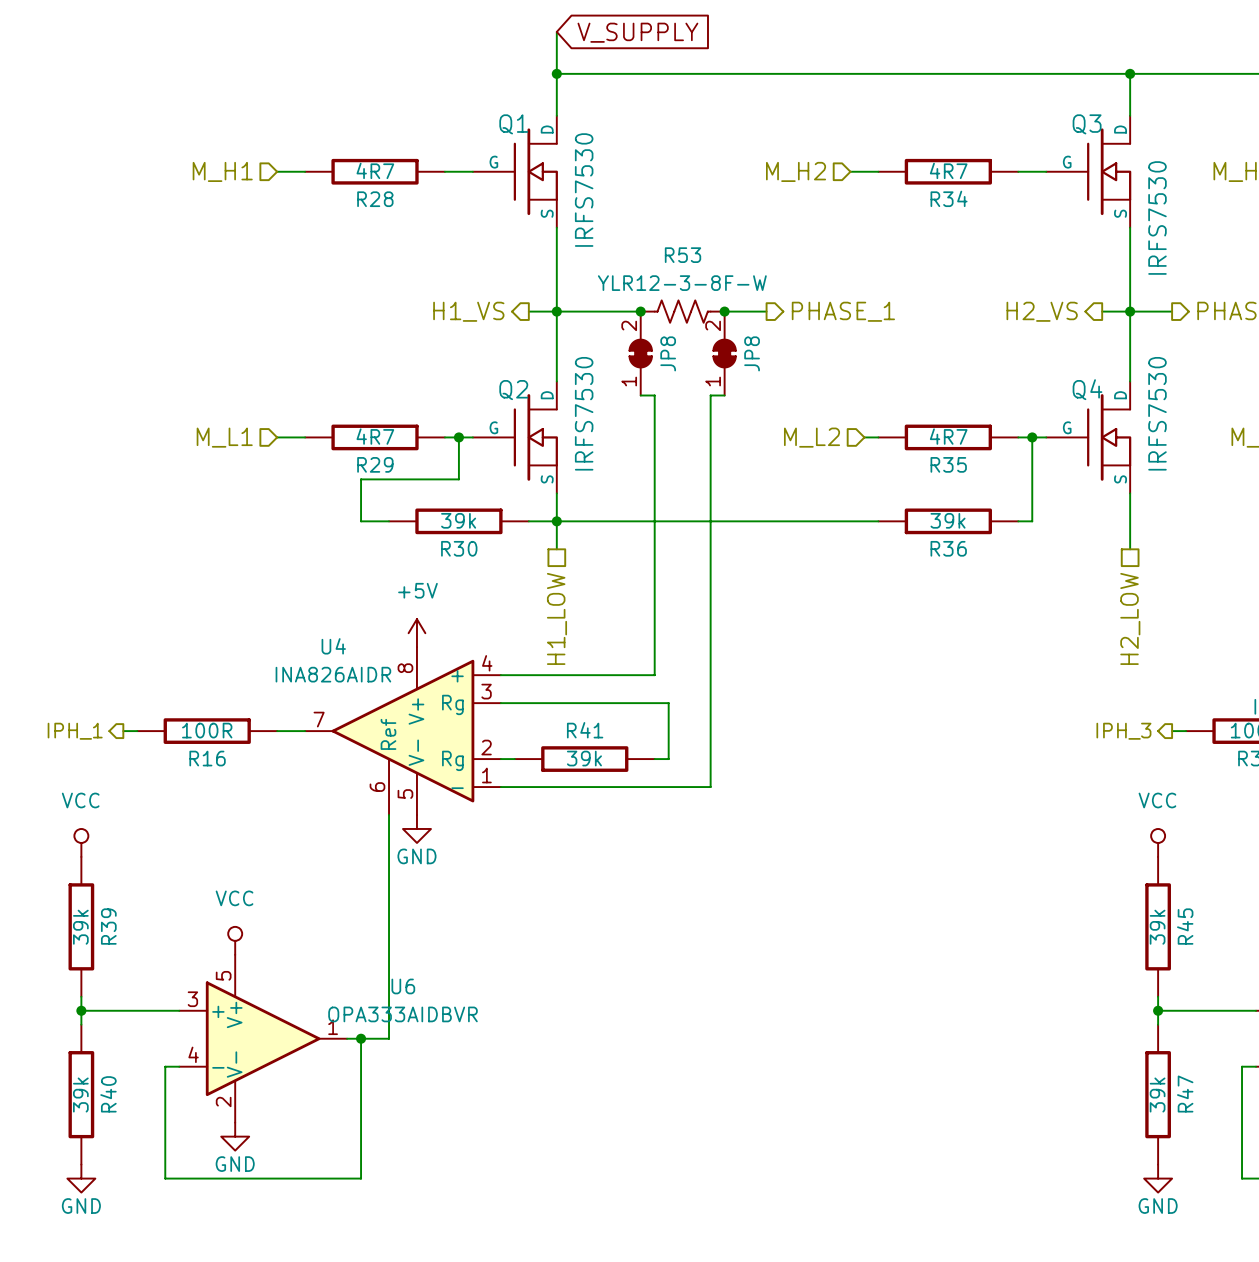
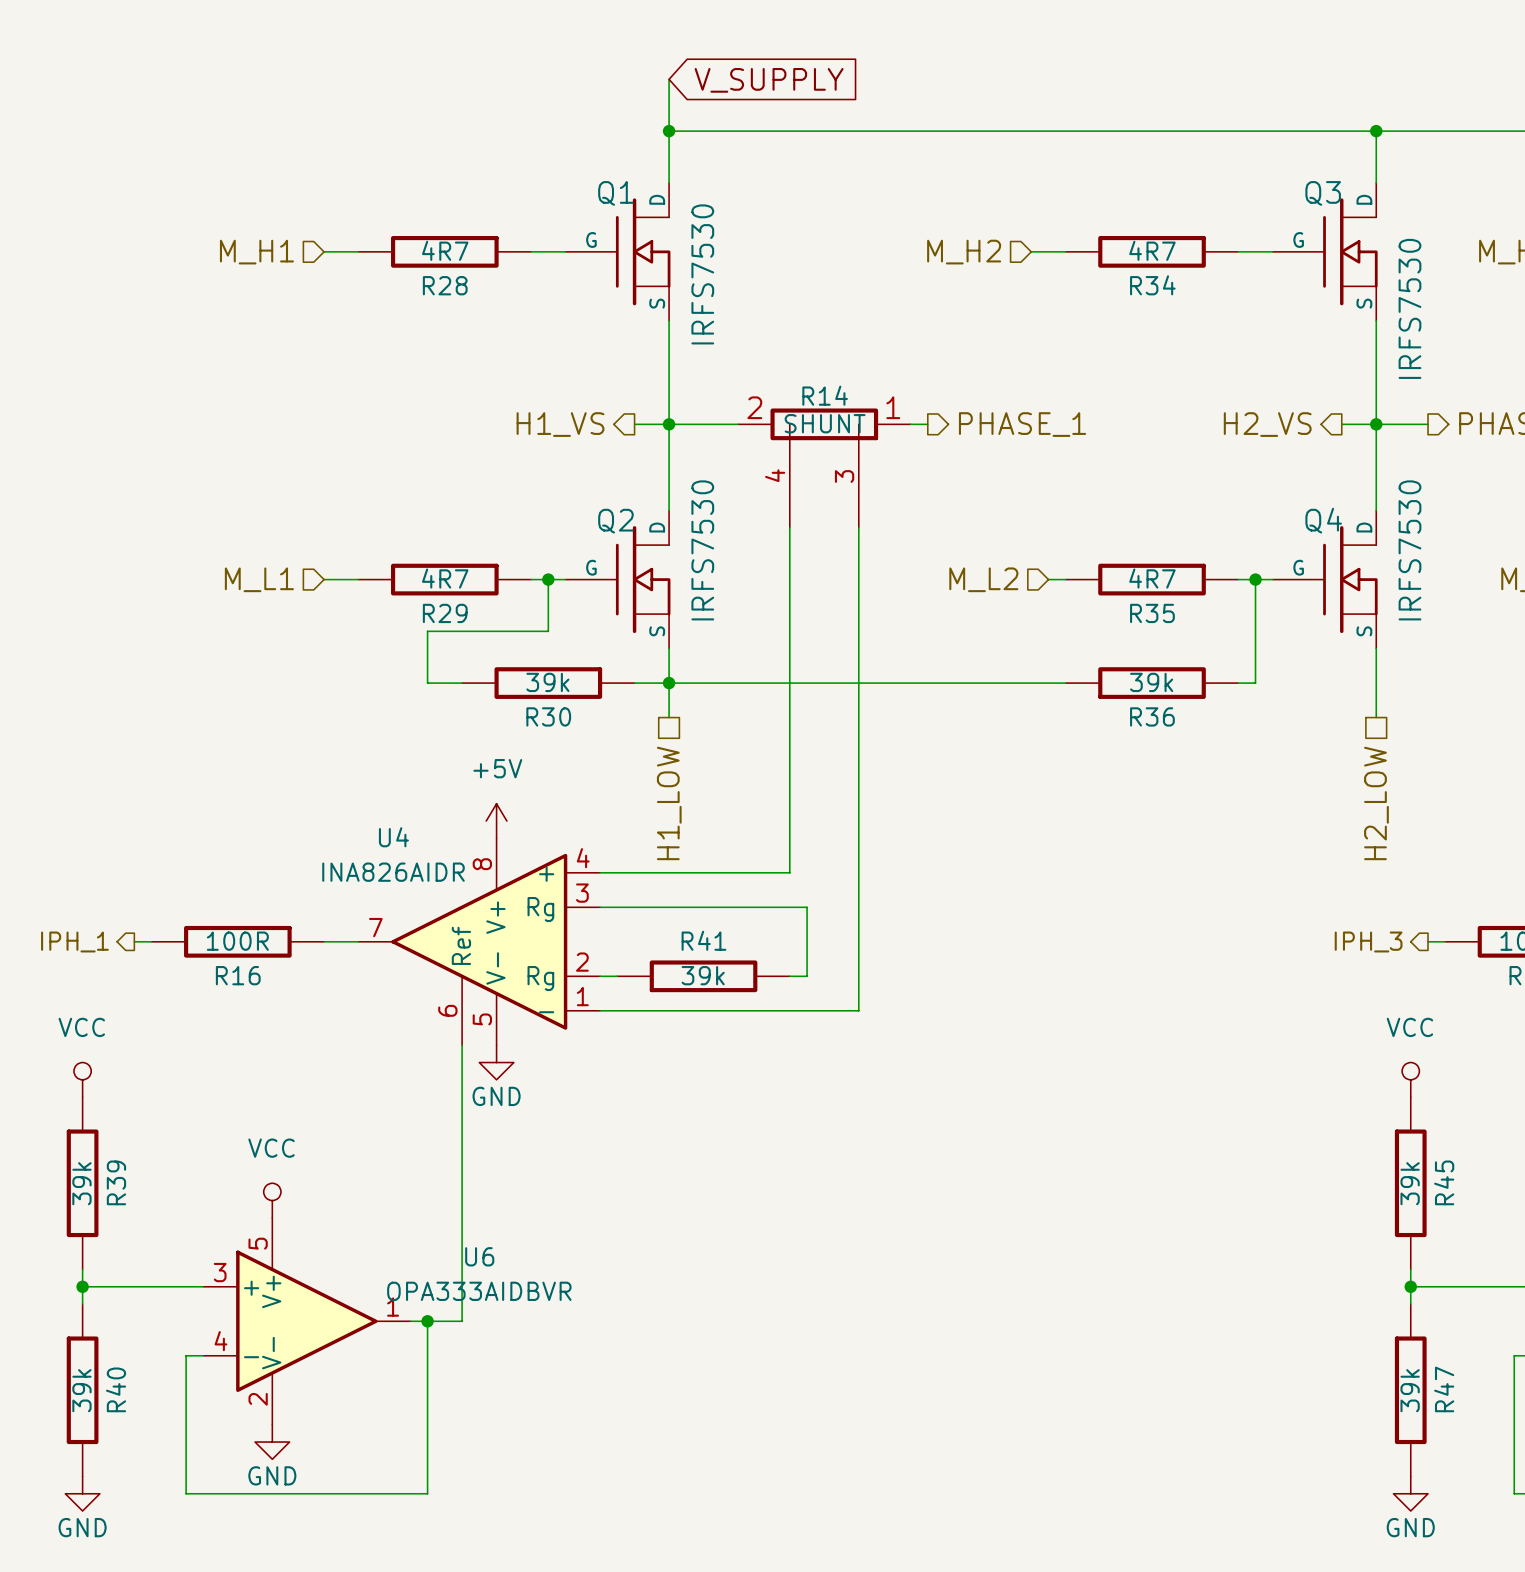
junction: (640, 311) -> none
R53: YLR12-3-8F-W (682, 311) -> none
junction: (724, 311) -> none
R14: none -> SHUNT (824, 468)
JP8: (640, 353) -> none
JP8: (724, 353) -> none
wire: (640, 395) (654, 395) -> none
wire: (710, 395) (724, 395) -> none

